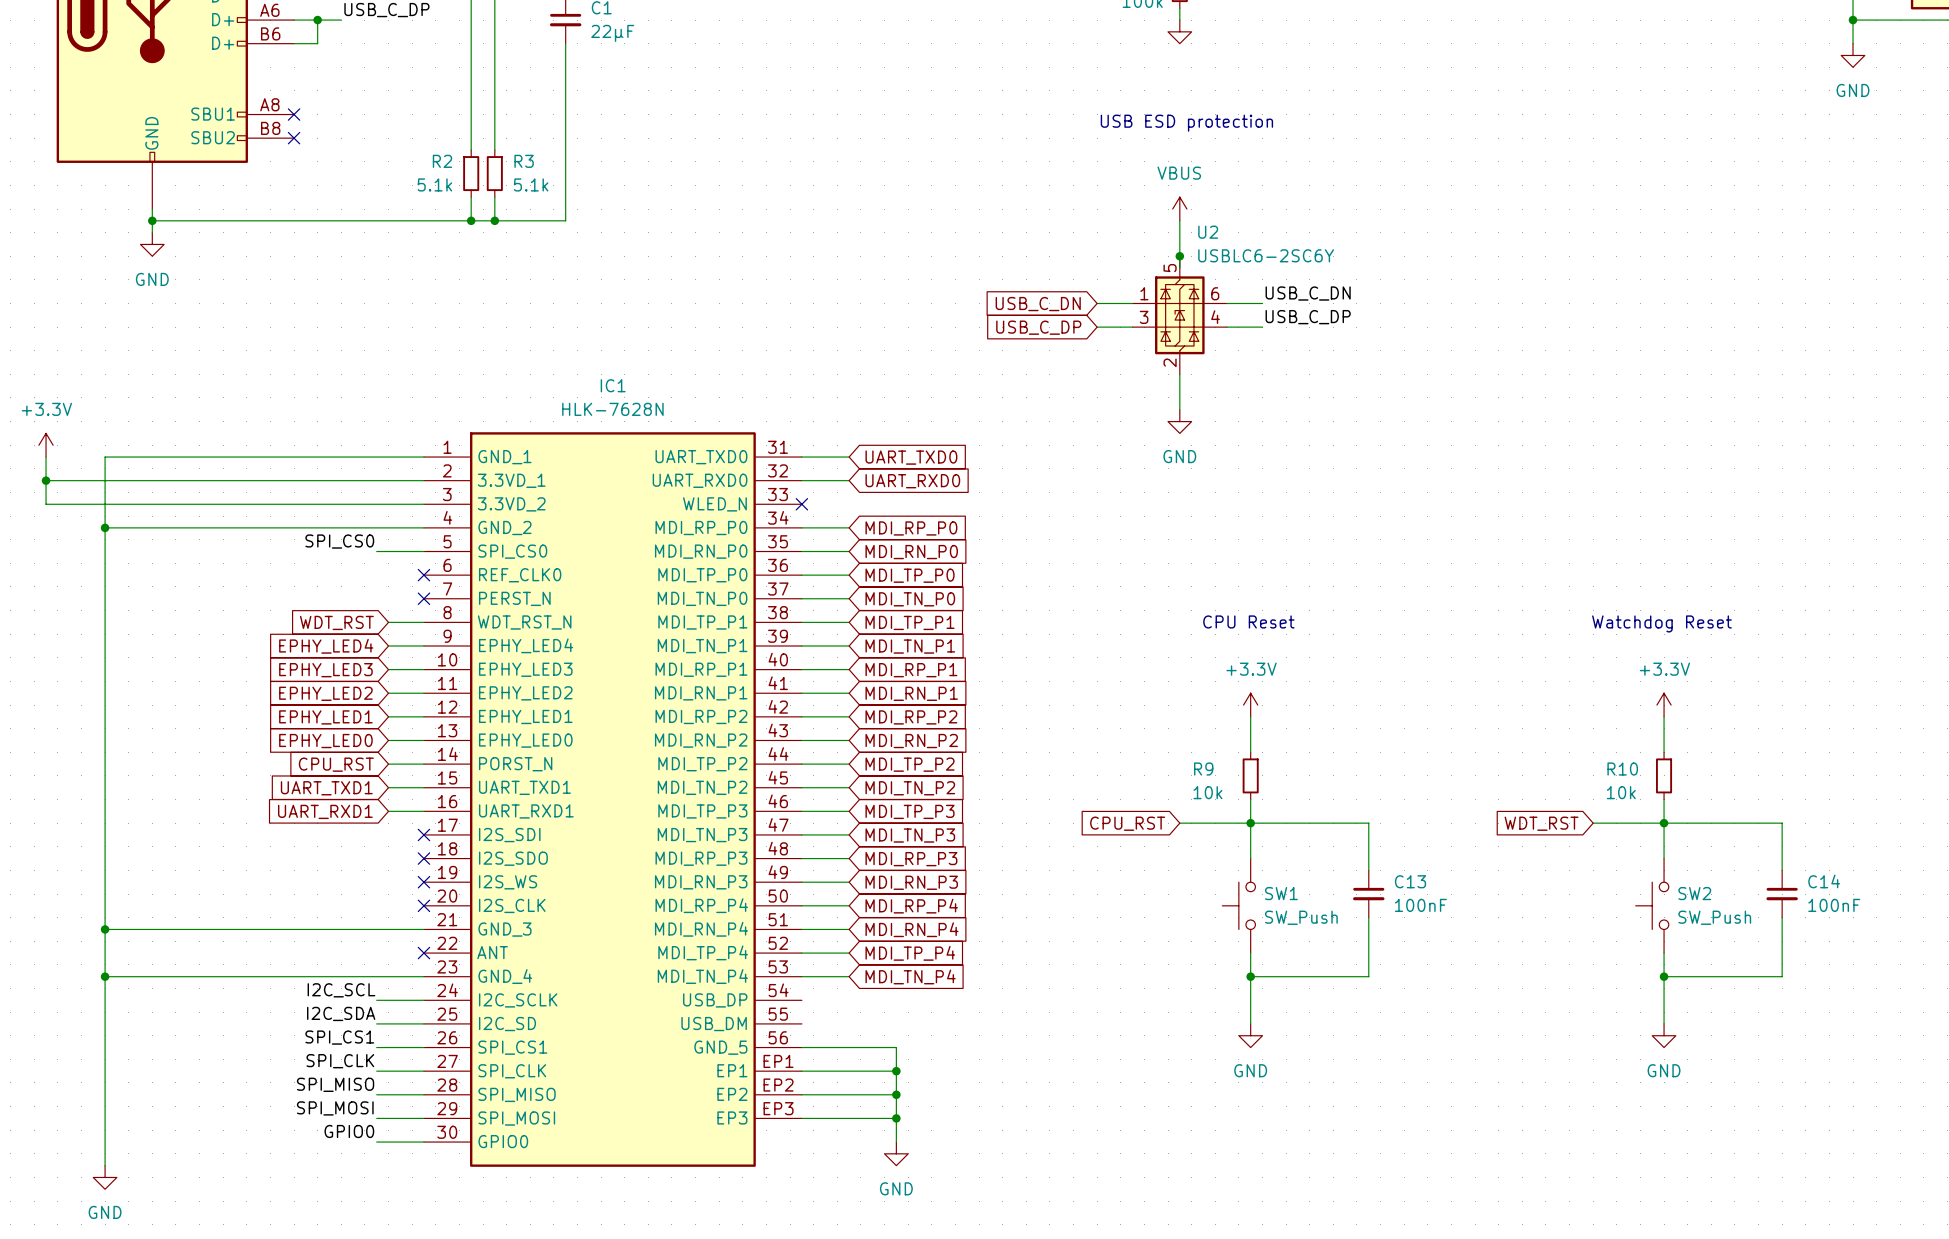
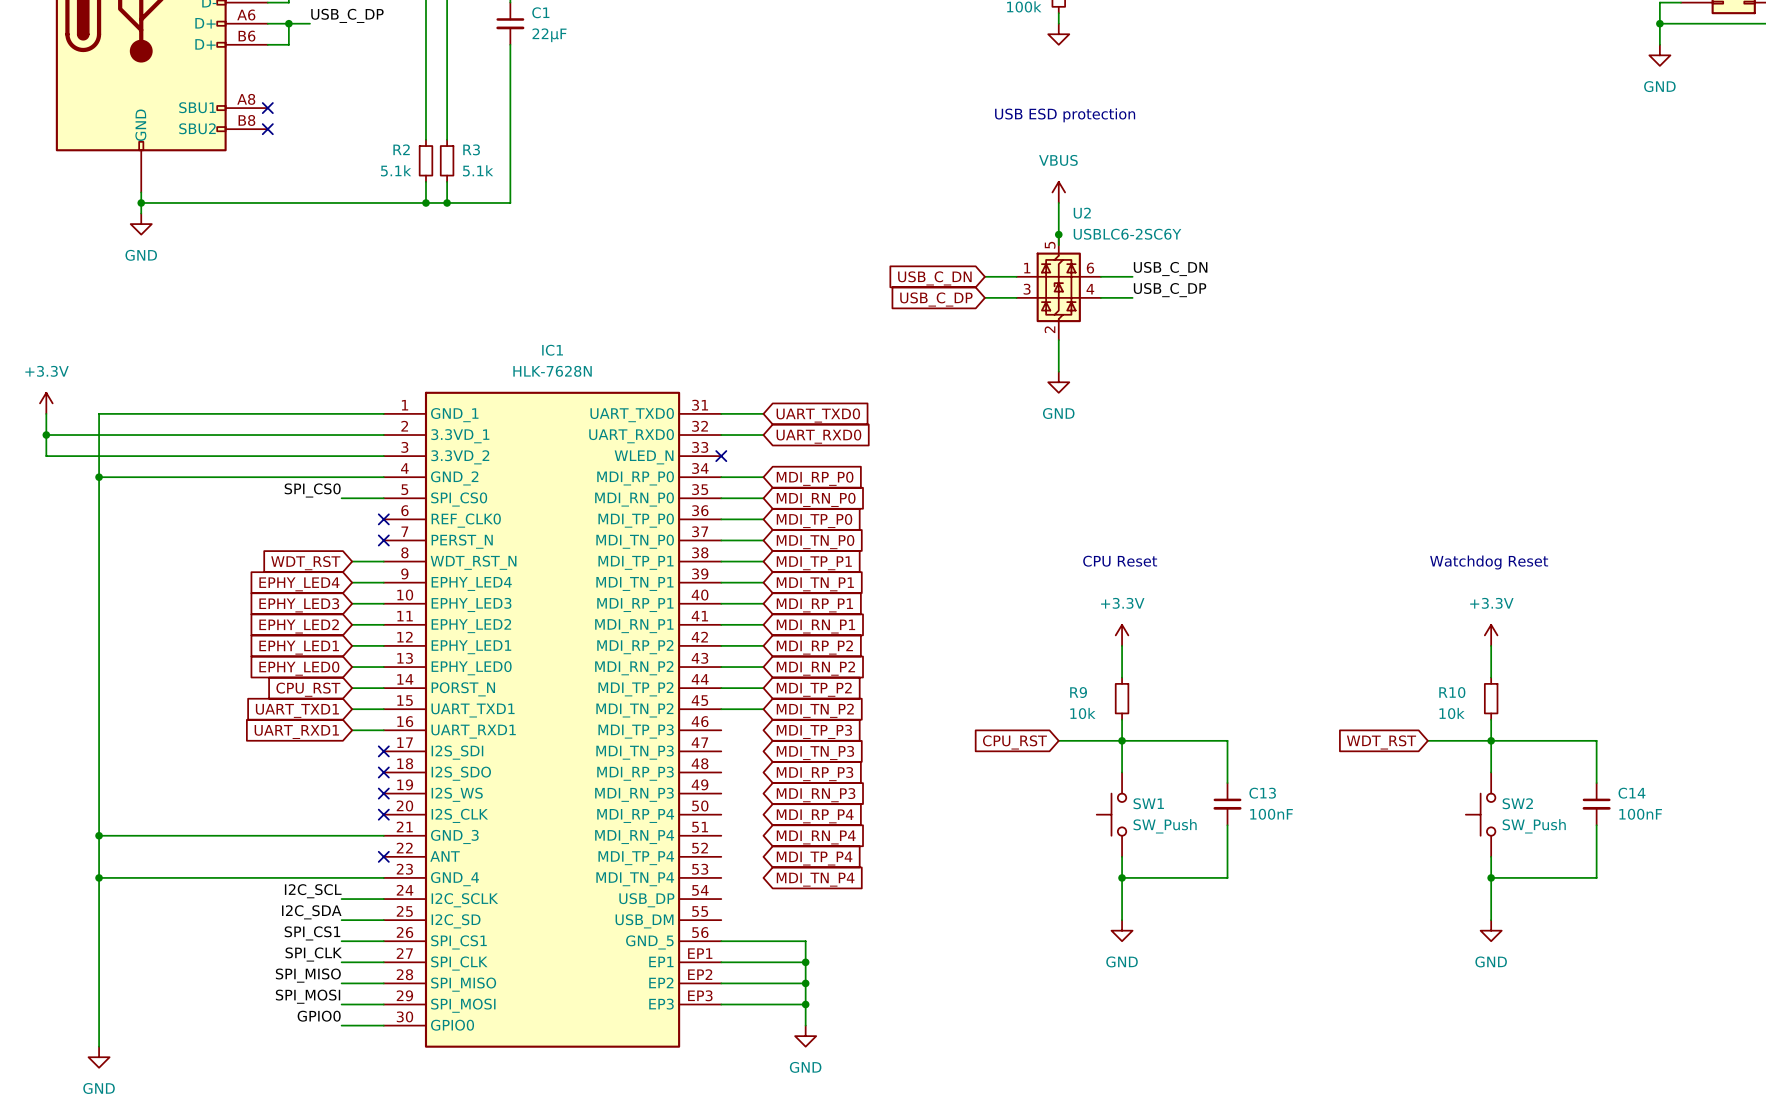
wire: (801, 811) (849, 811) -> none
wire: (801, 834) (849, 834) -> none
wire: (801, 858) (849, 858) -> none
wire: (801, 882) (849, 882) -> none
wire: (801, 905) (849, 905) -> none
wire: (801, 929) (849, 929) -> none
wire: (801, 953) (849, 953) -> none
wire: (801, 976) (849, 976) -> none

